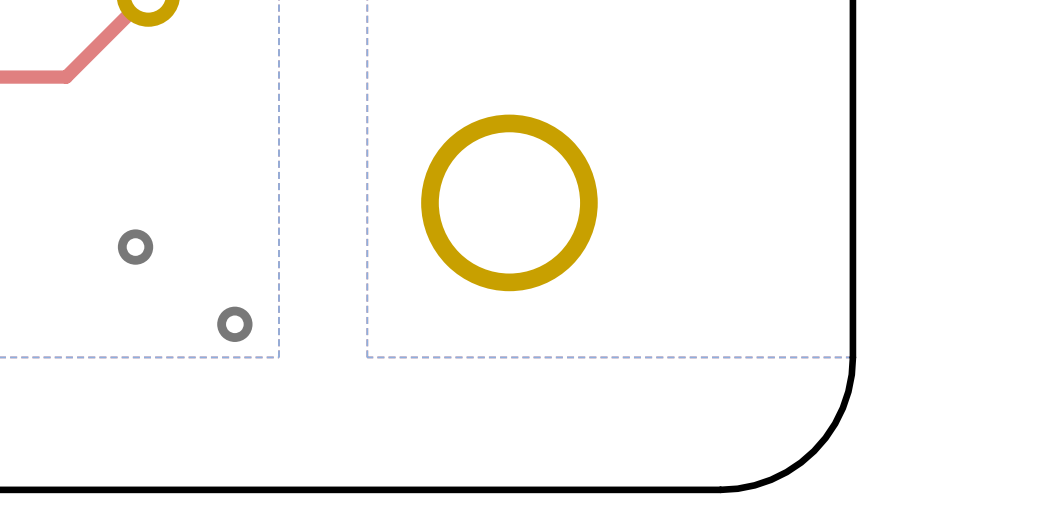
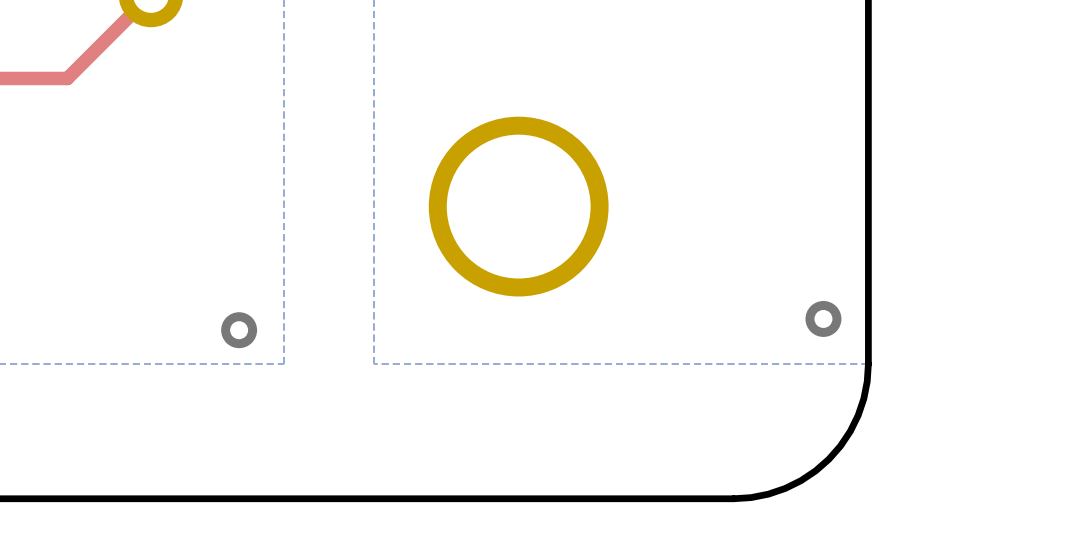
via: (135, 247) -> none
via: none -> (823, 318)

